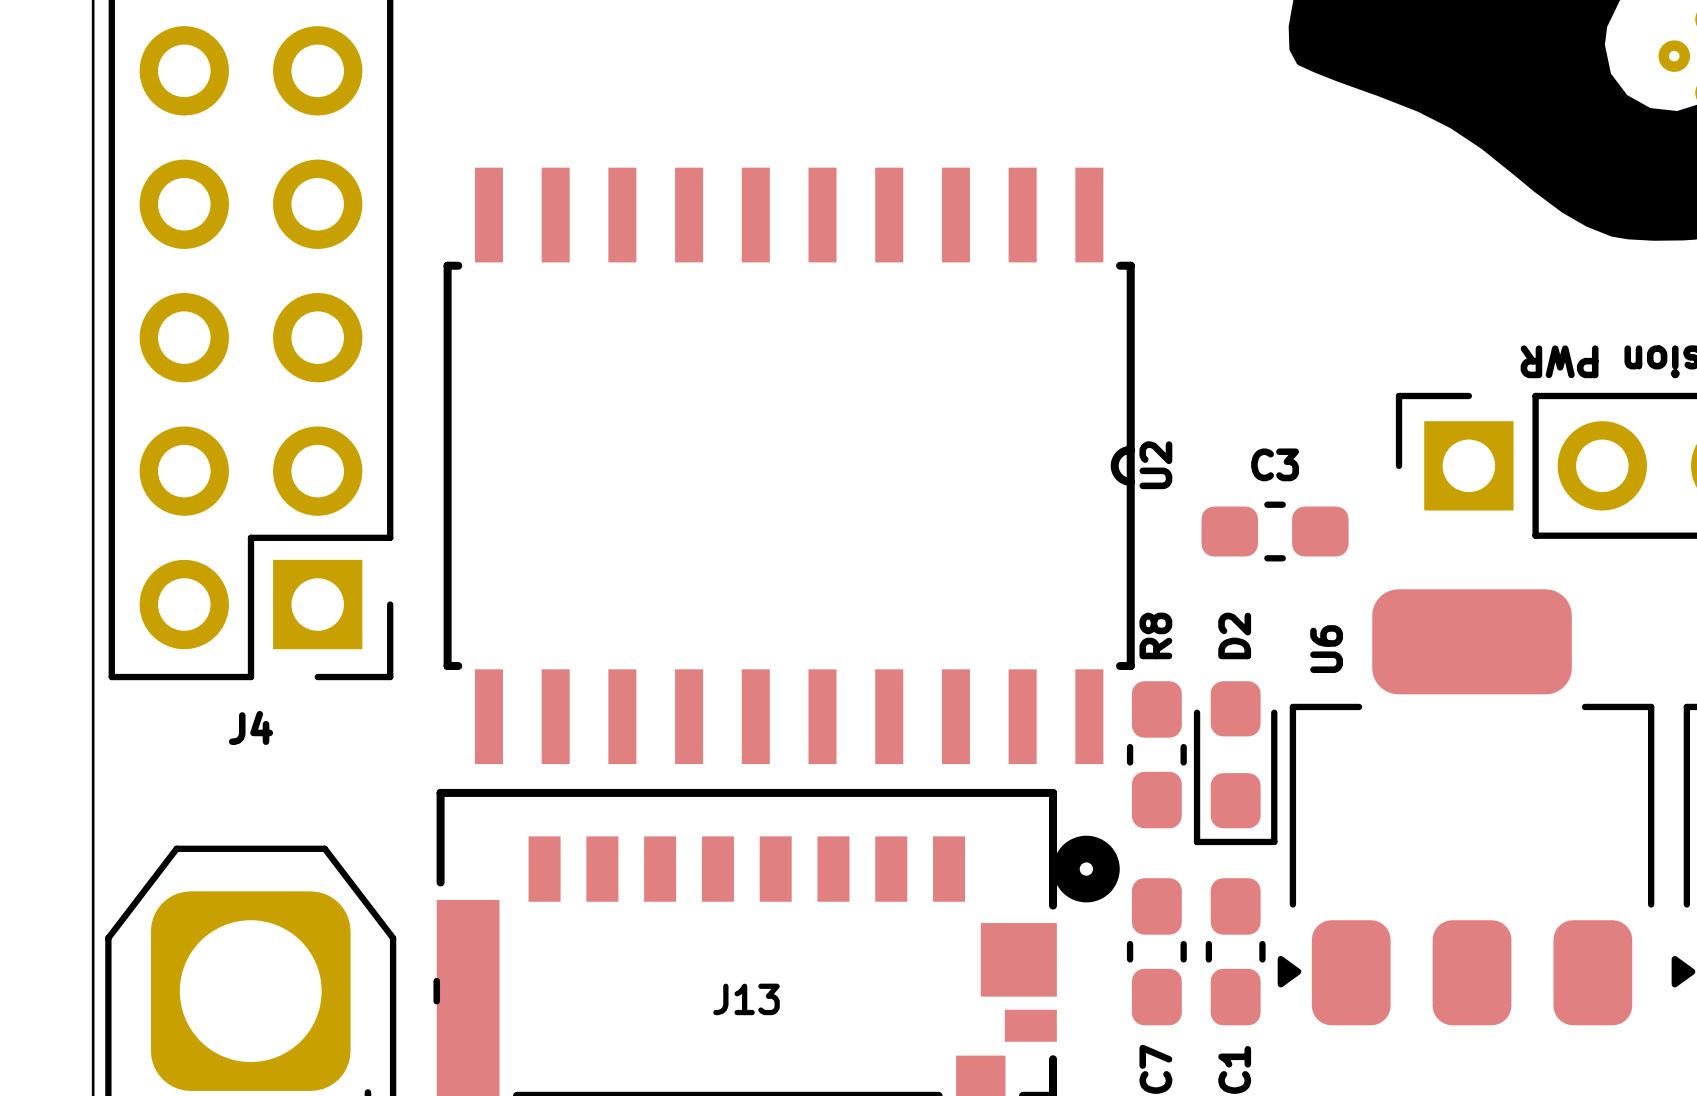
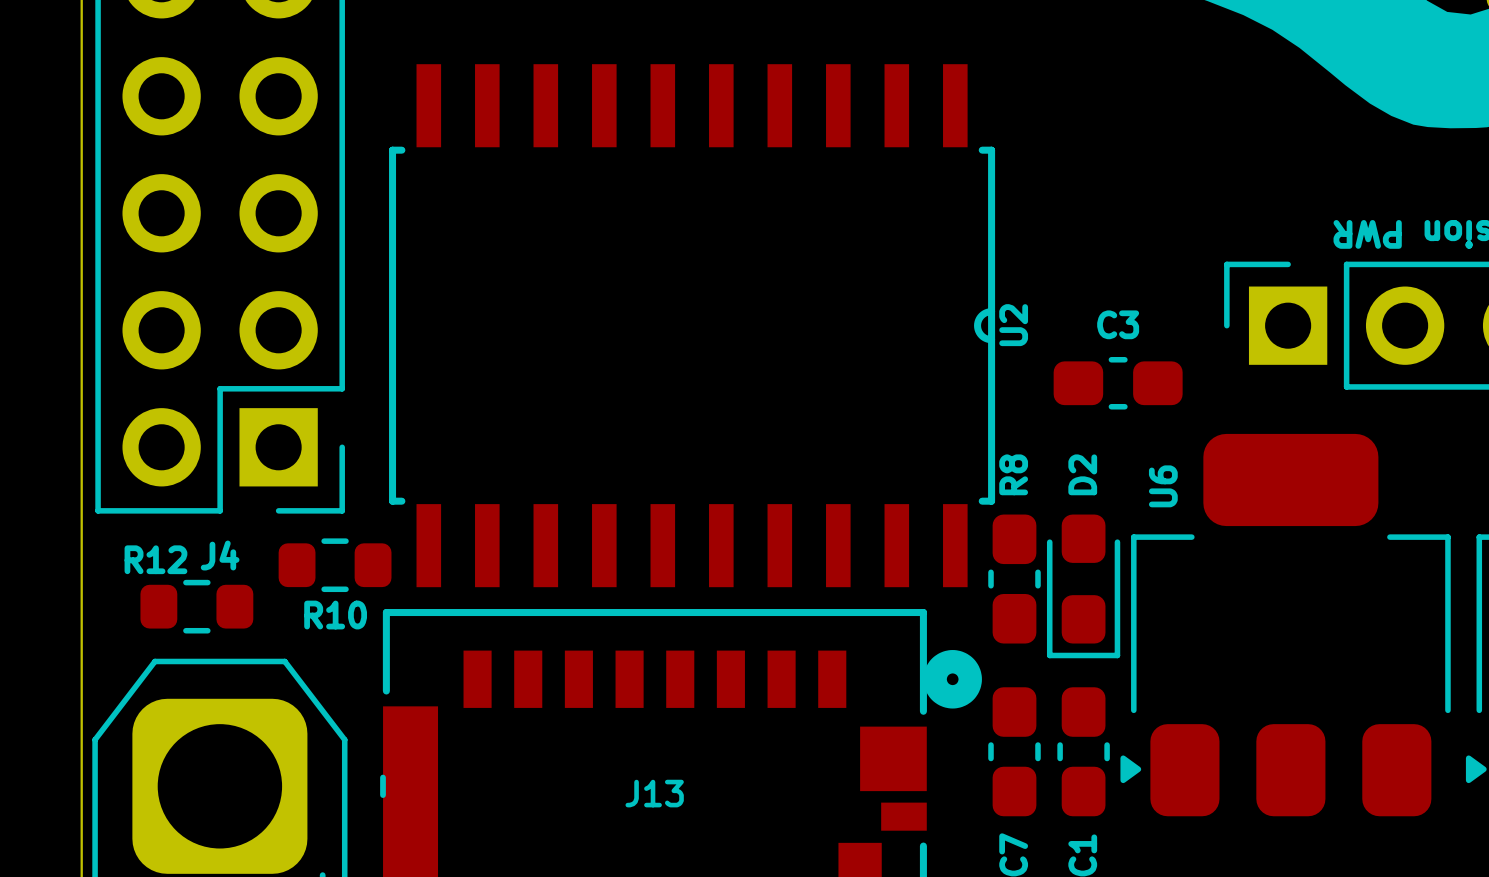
R10: none -> (335, 565)
R12: none -> (196, 606)

